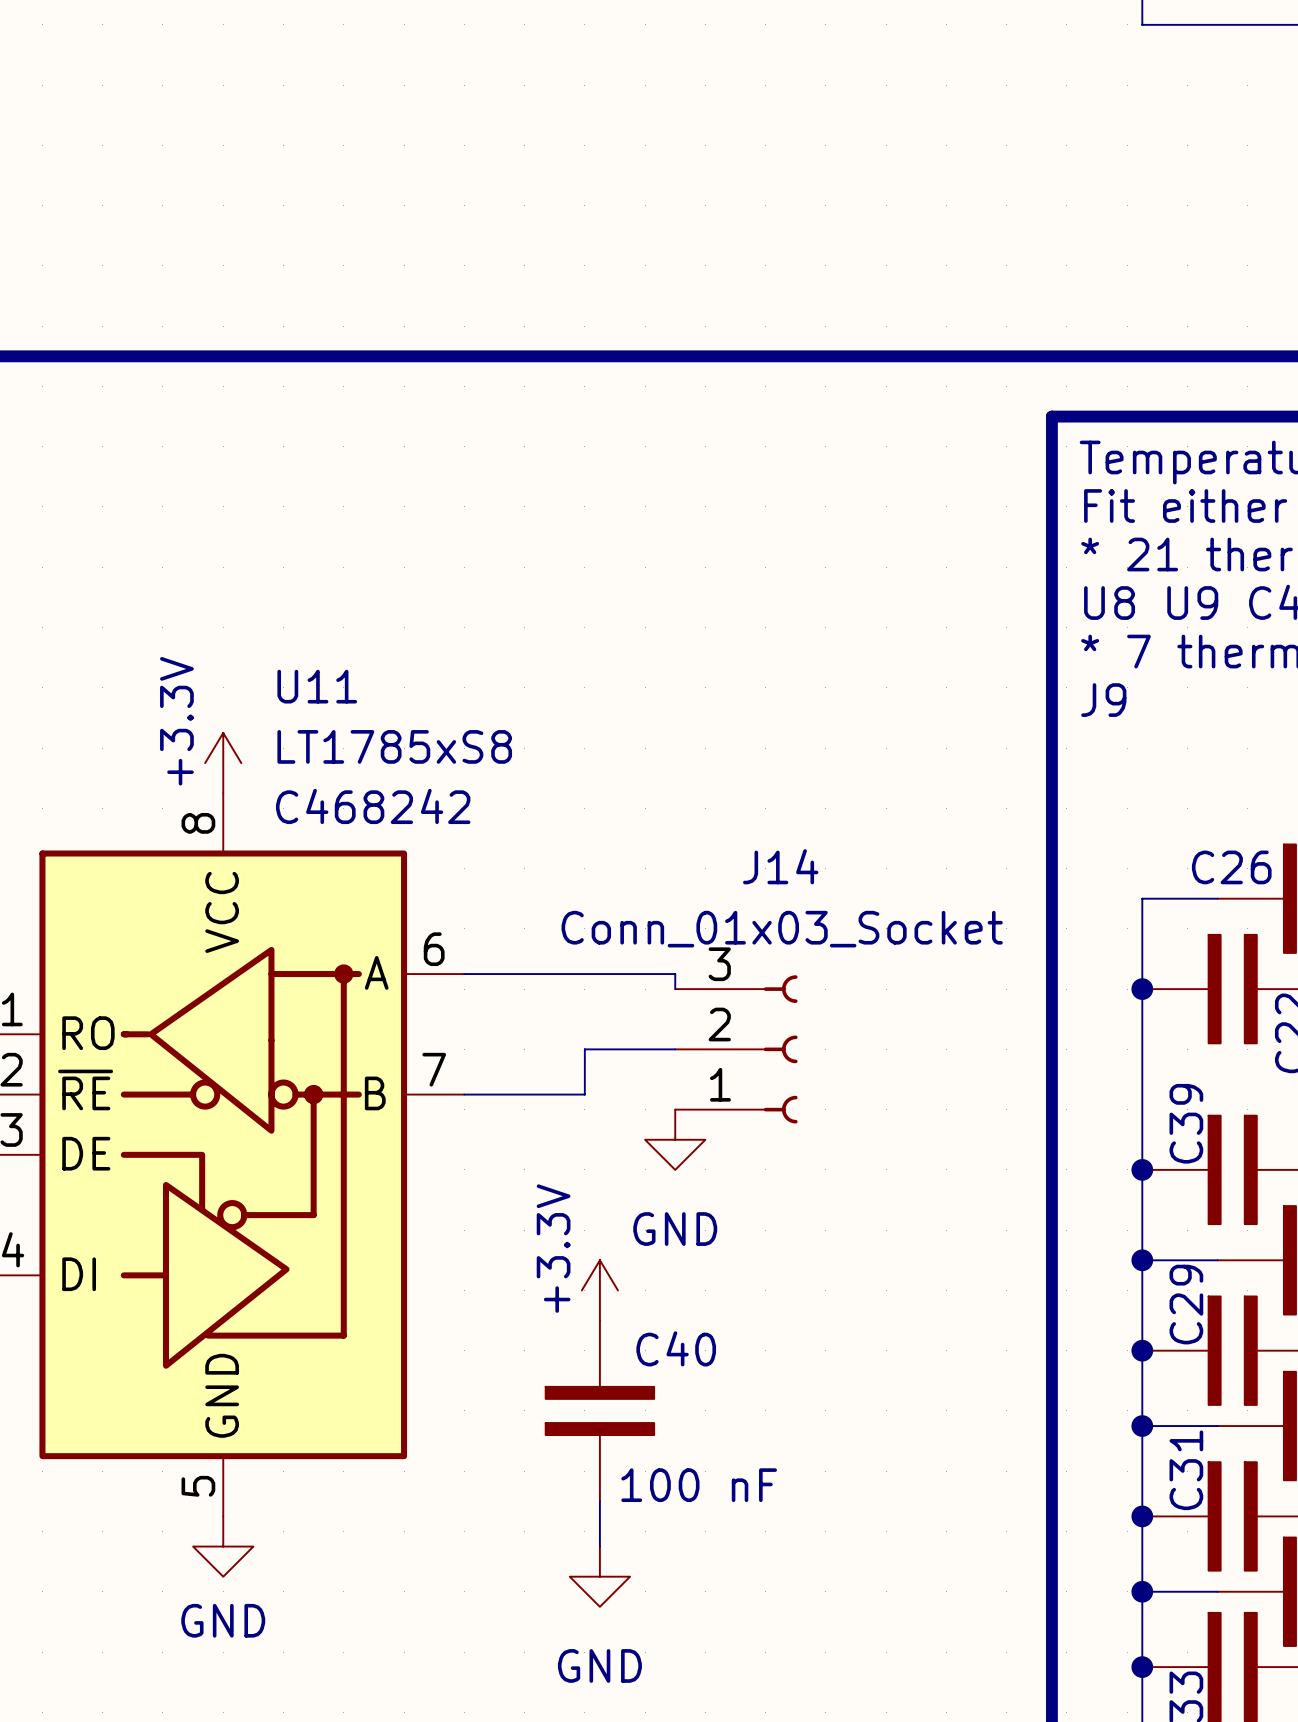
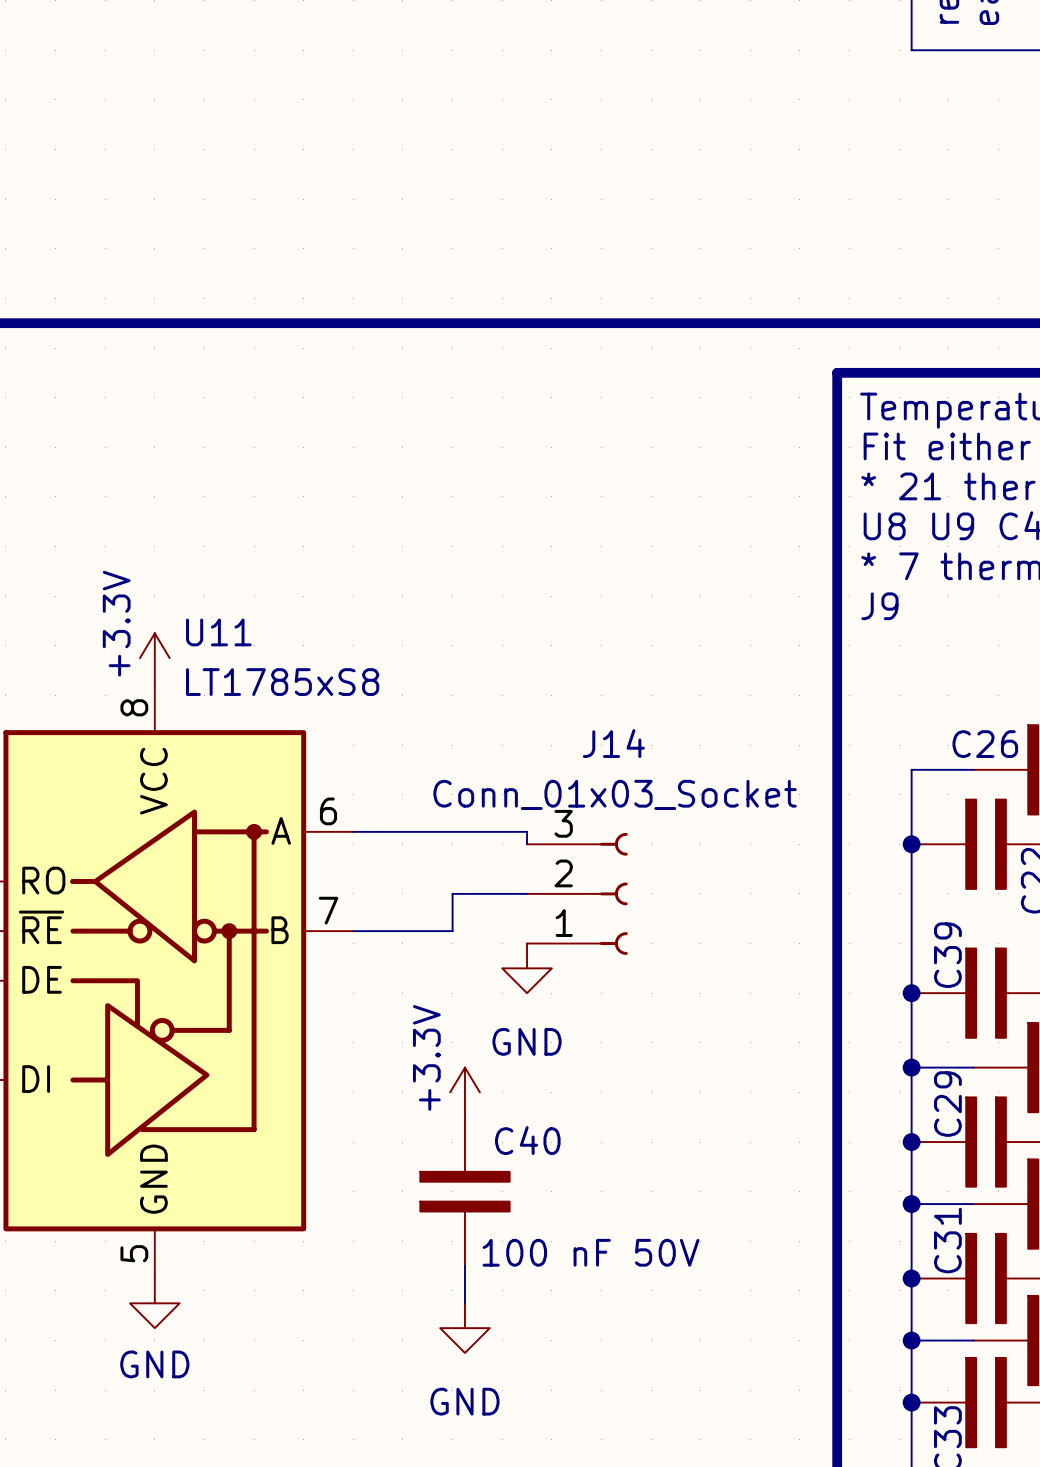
U11 name position: U11 (317, 686) -> U11 (218, 632)
U11 value position: LT1785xS8 (394, 746) -> LT1785xS8 (282, 682)
U11 text: C468242 (373, 806) -> none
C40 text: 100 nF (699, 1485) -> 100 nF 50V (591, 1252)

